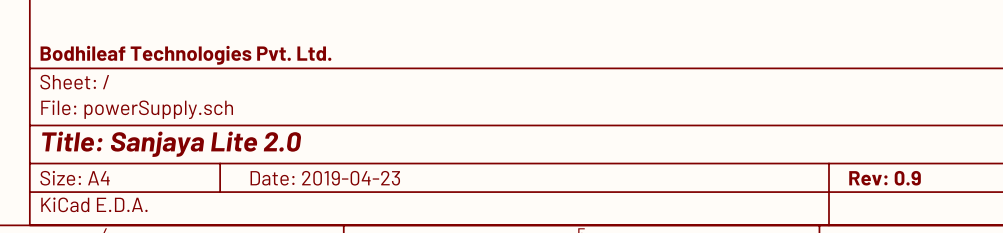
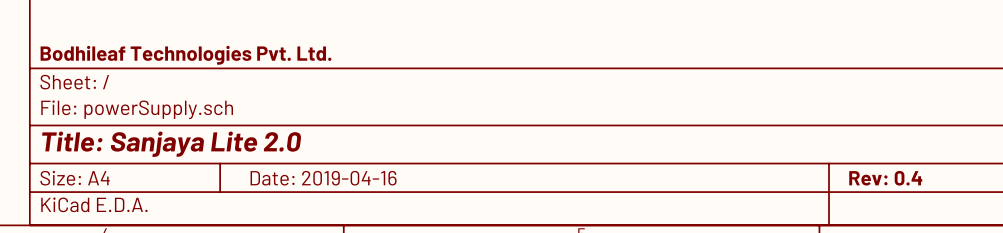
title block: Date: 2019-04-23 (325, 178) -> Date: 2019-04-16 (323, 178)
title block: Rev: 0.9 (885, 178) -> Rev: 0.4 (885, 178)

